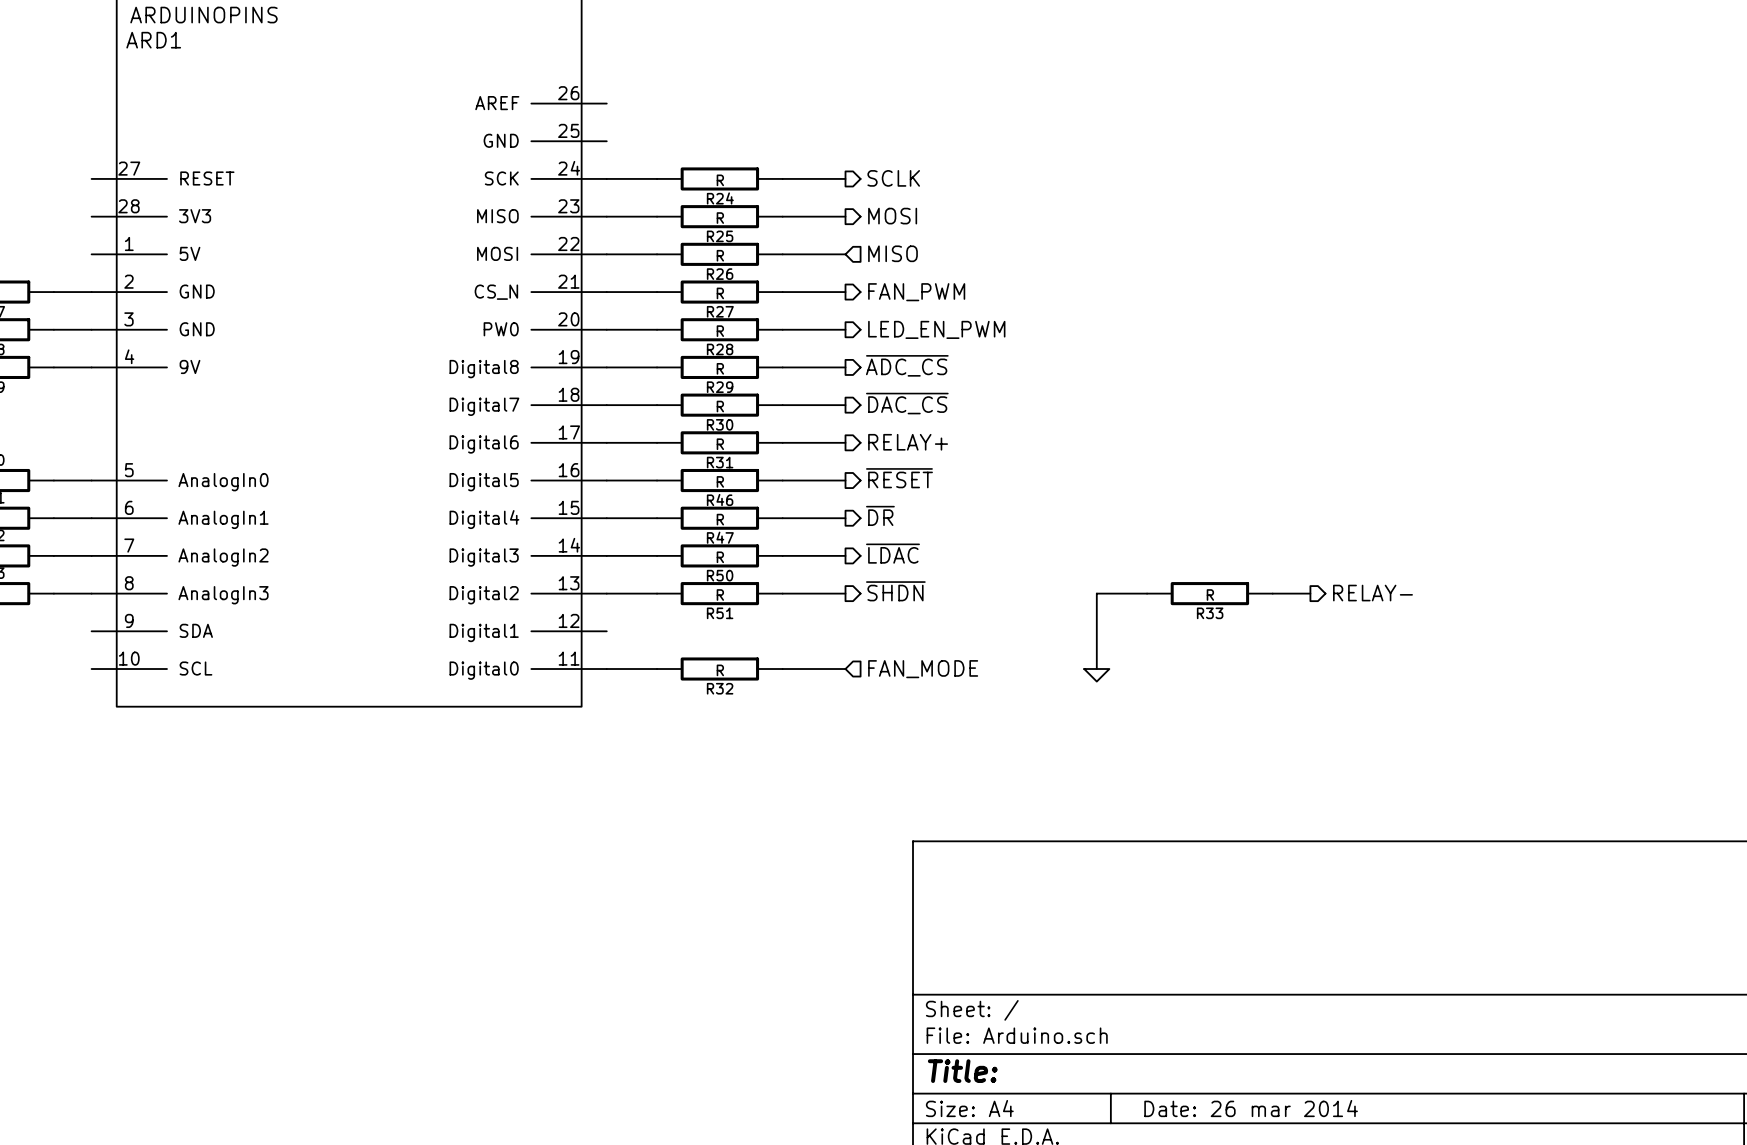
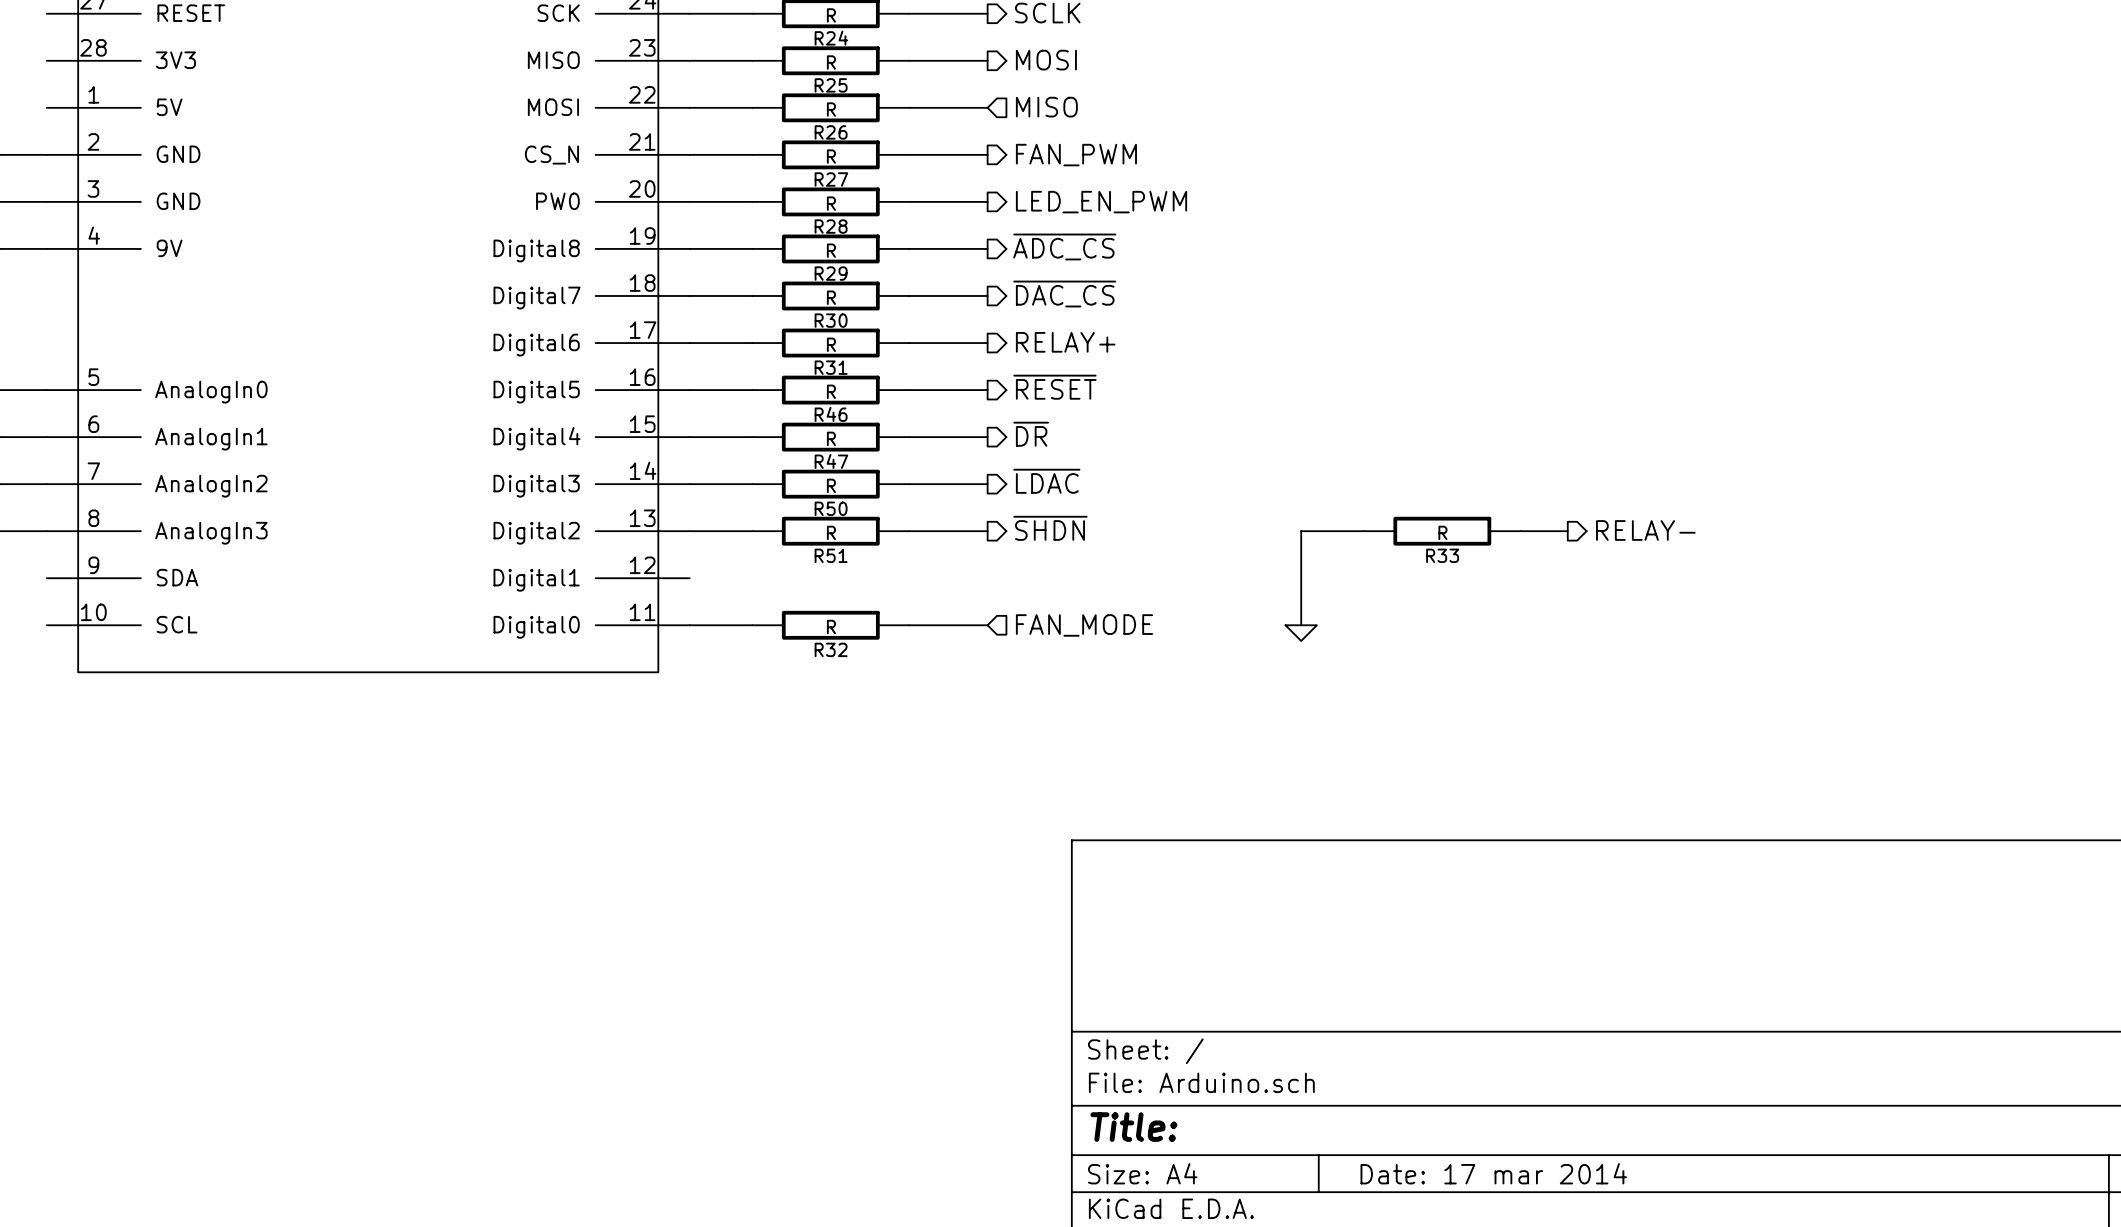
title block: Date: 26 mar 2014 (1251, 1108) -> Date: 17 mar 2014 (1493, 1173)

